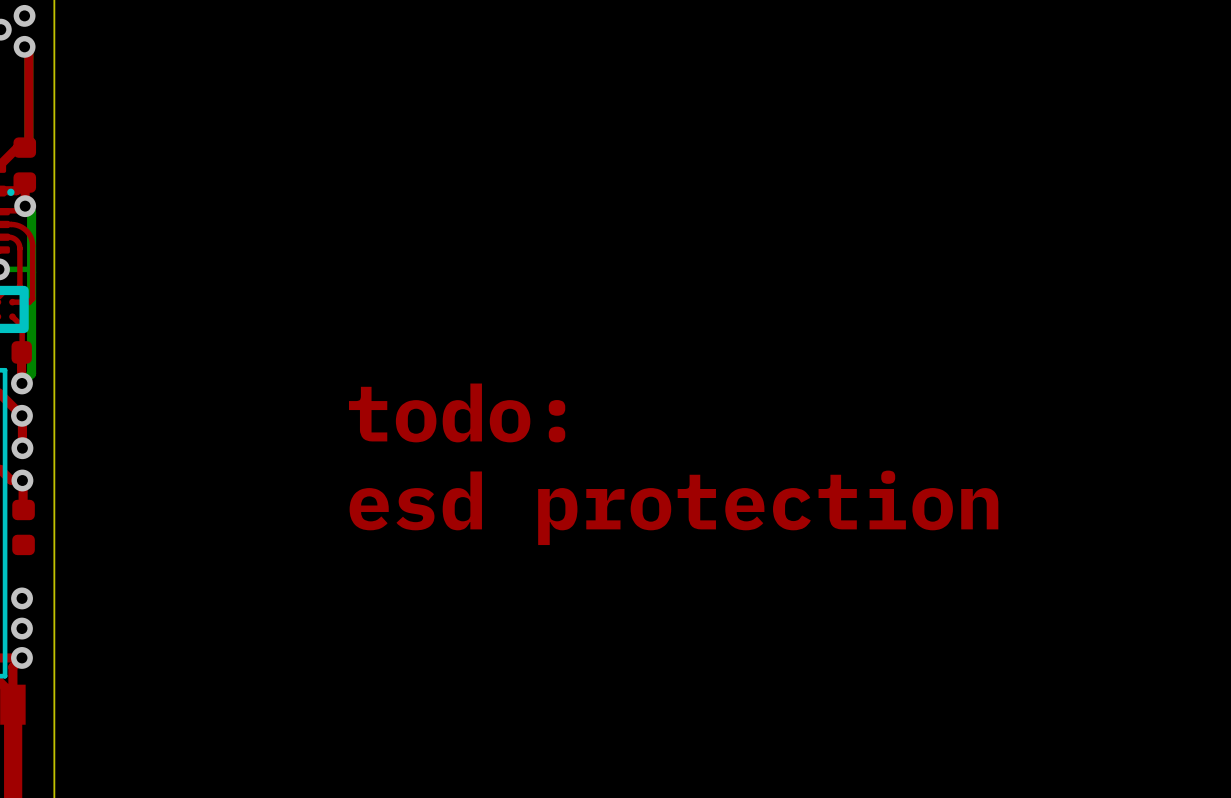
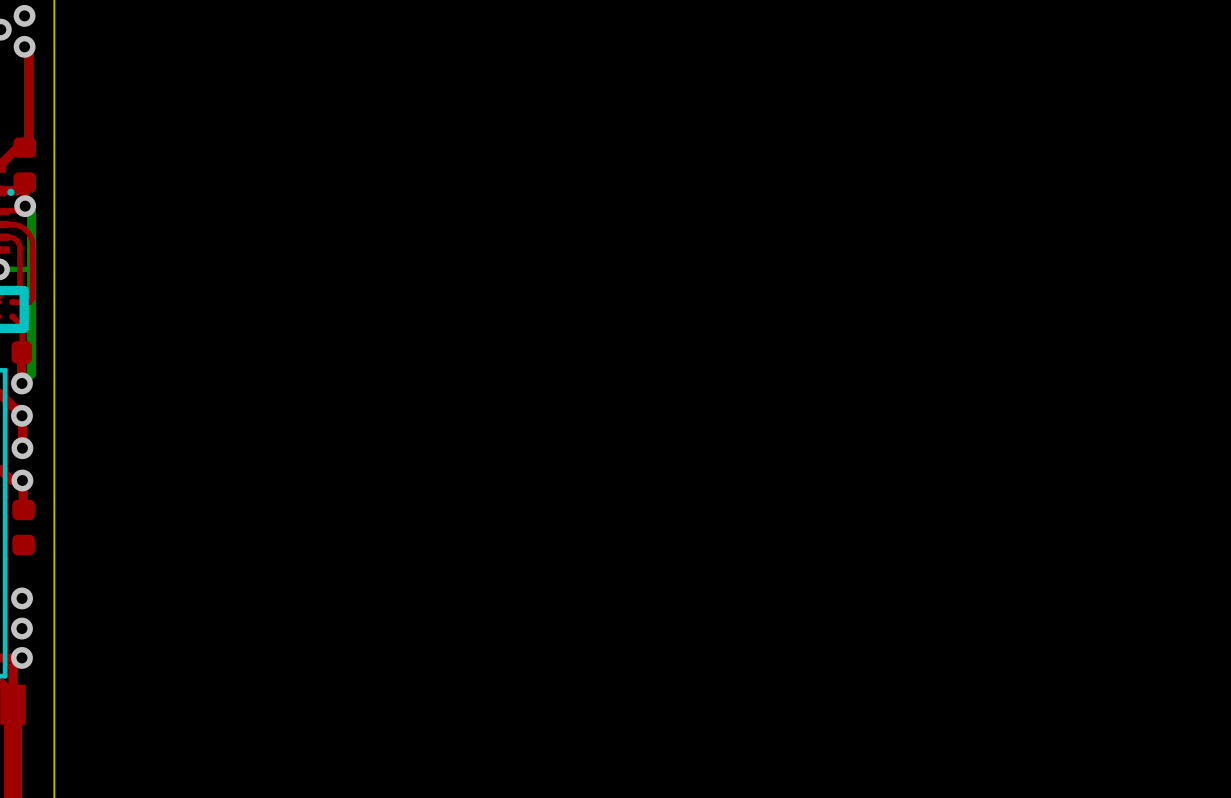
text: todo: (457, 412) -> none
text: esd protection (673, 507) -> none

